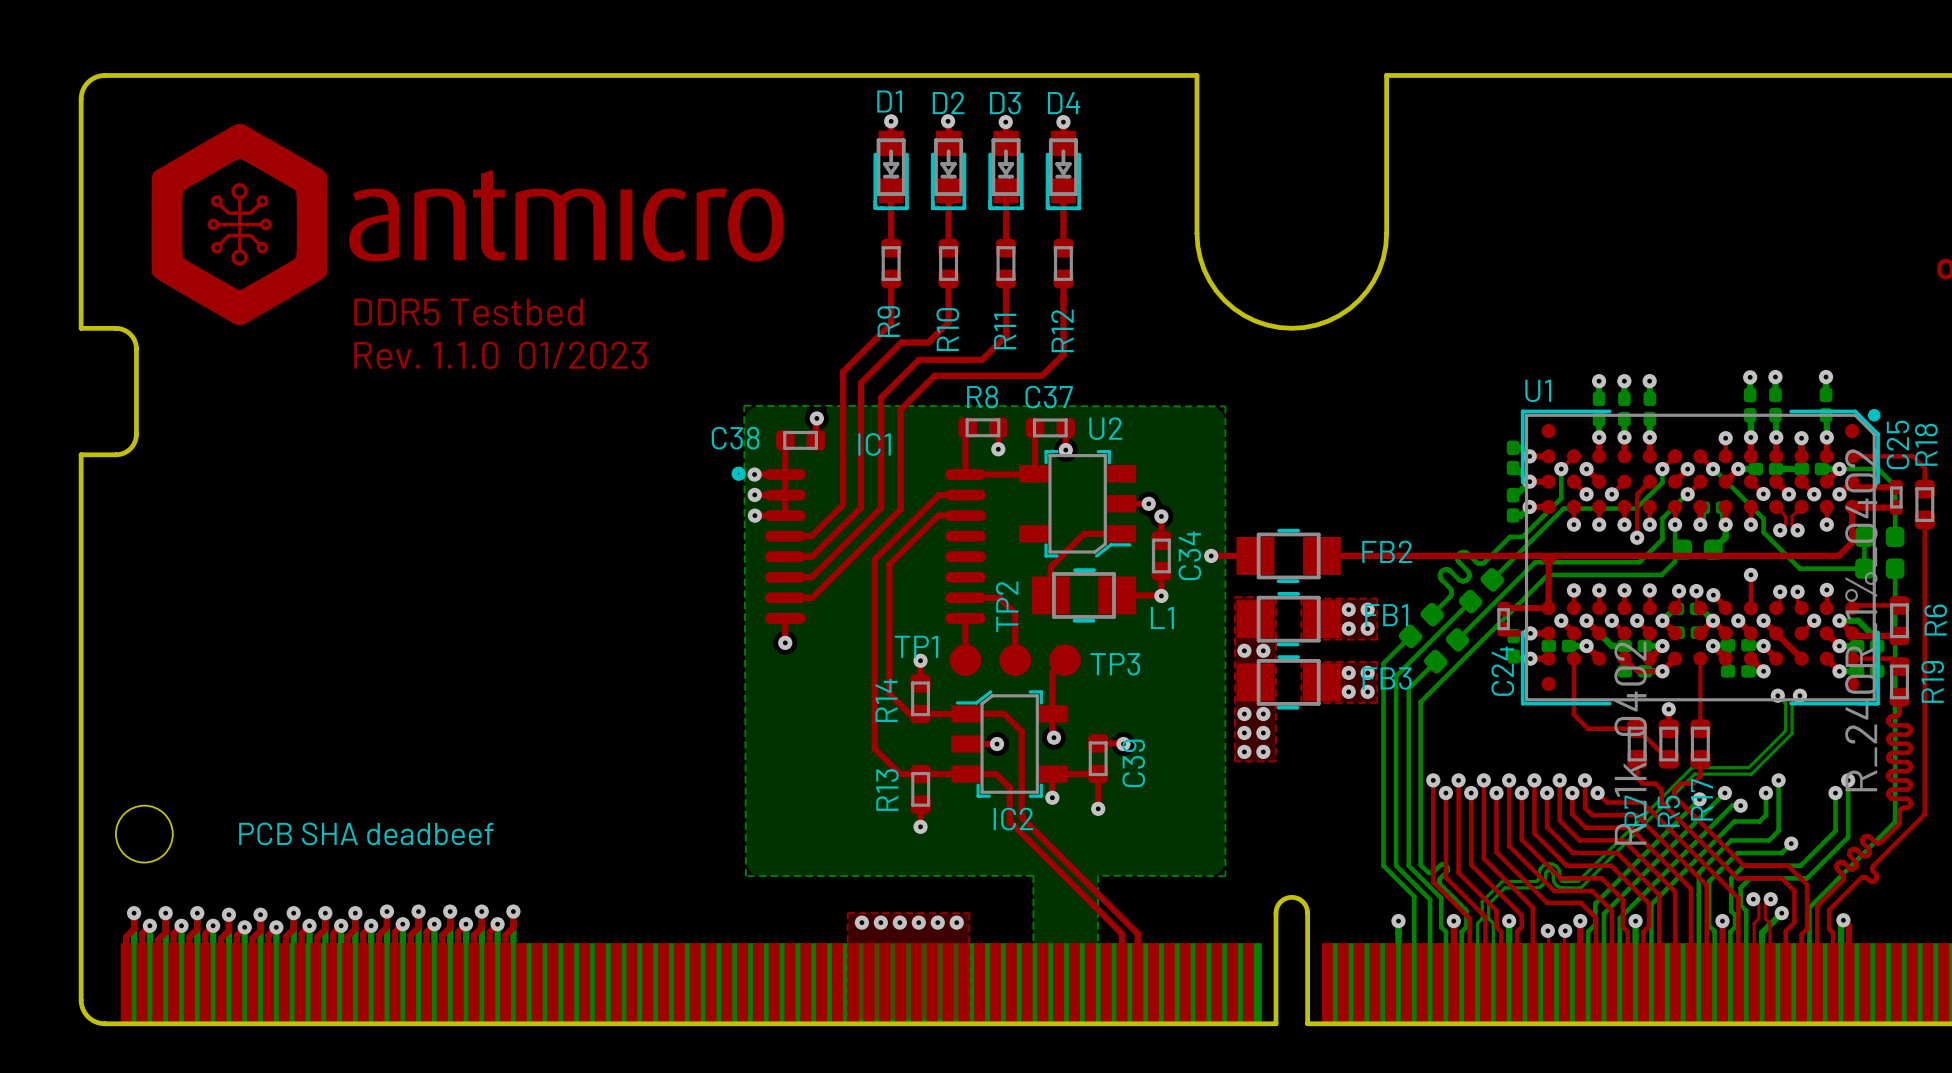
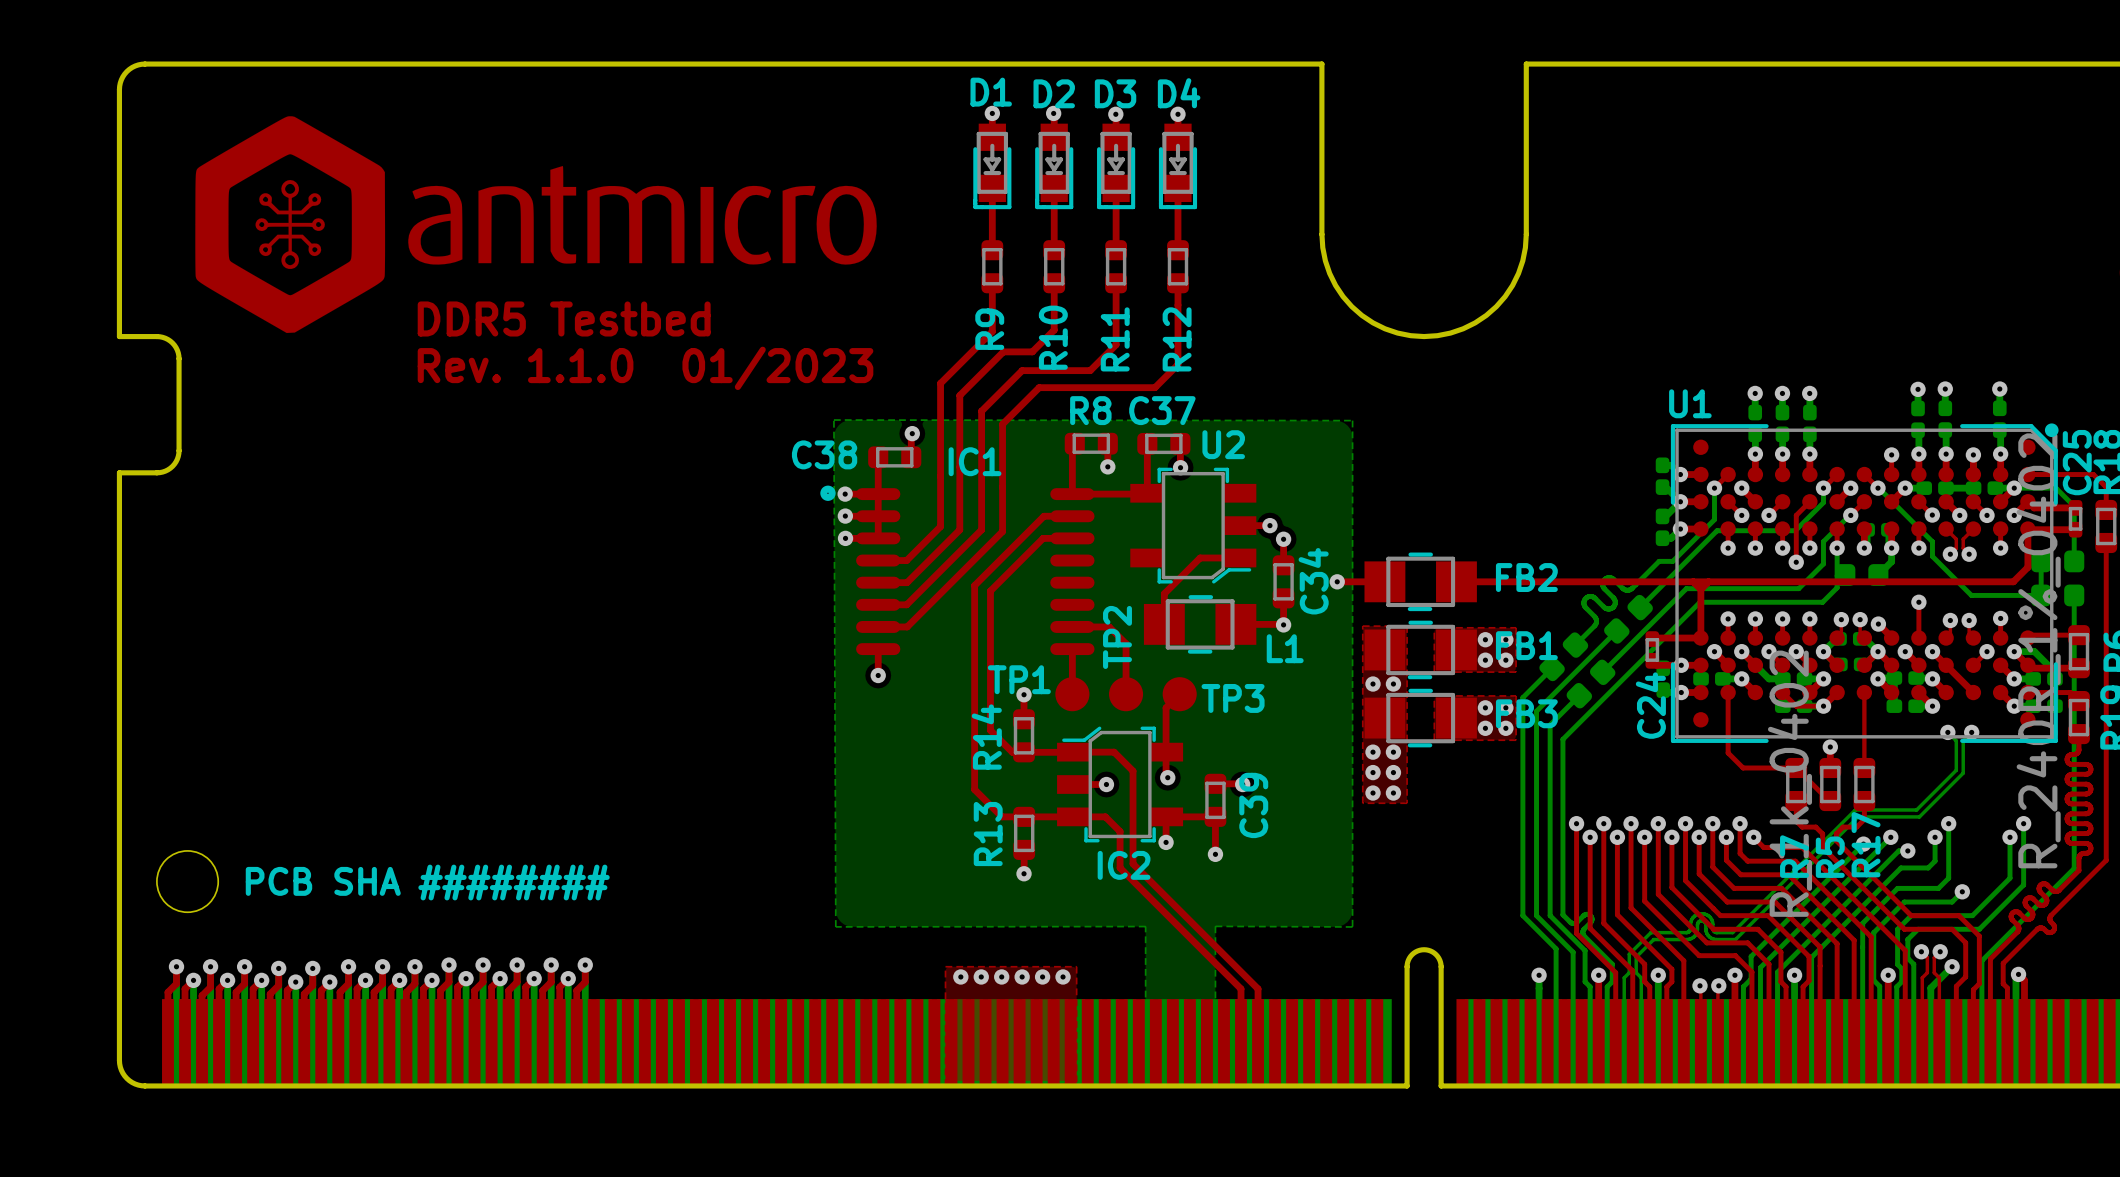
text: PCB SHA deadbeef (366, 833) -> PCB SHA ######## (427, 882)

